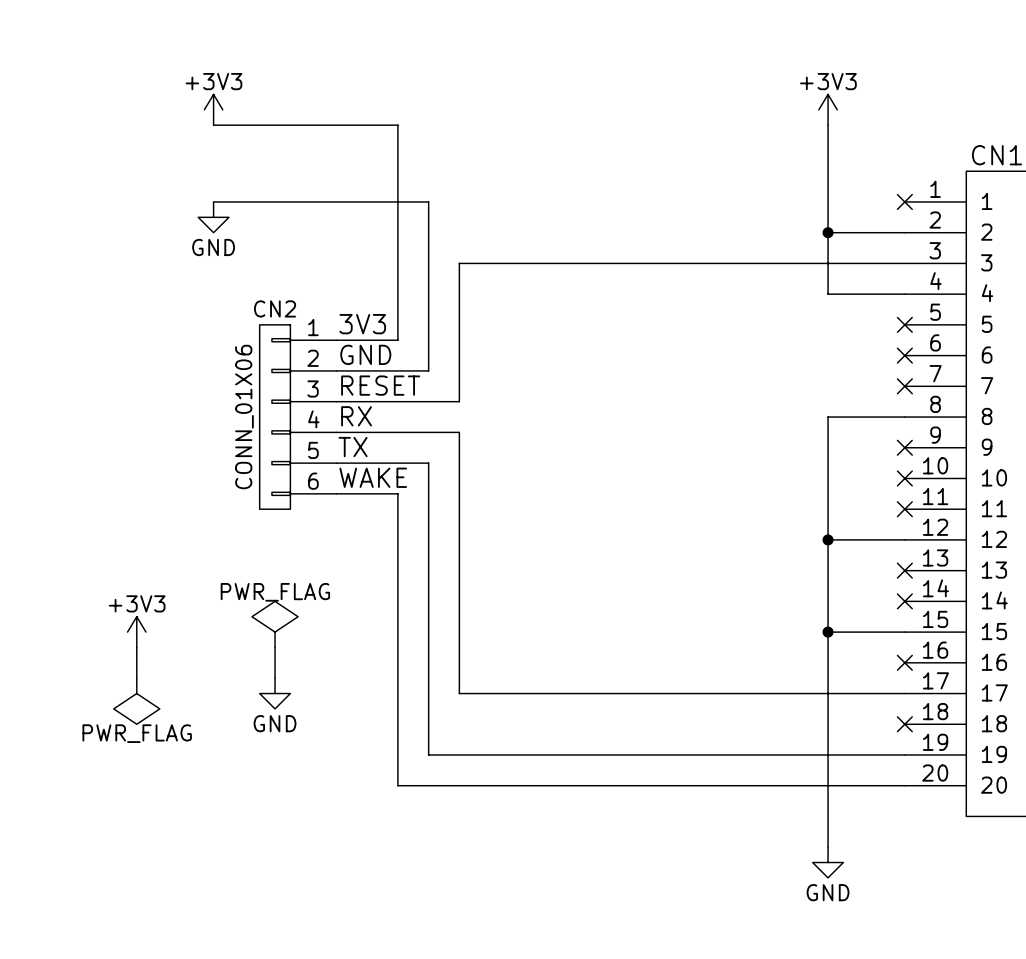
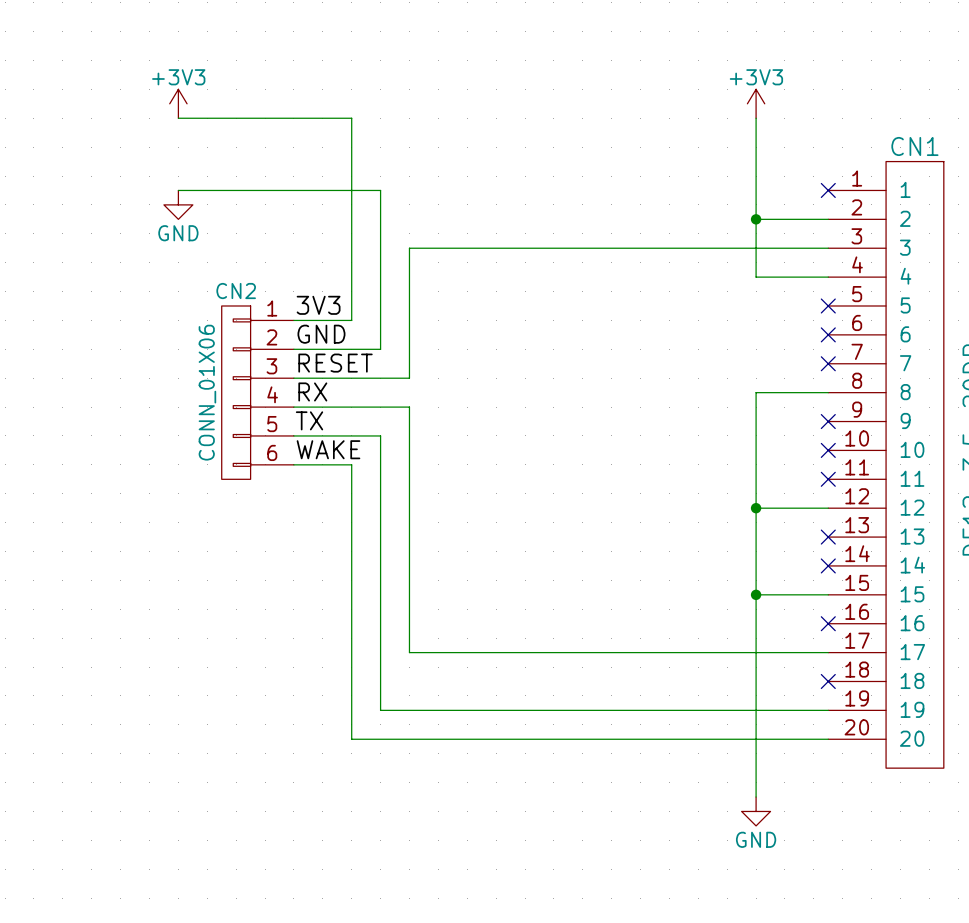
power symbol: PWR_FLAG (275, 624) -> none
power symbol: +3V3 (136, 632) -> none
wire: (136, 647) (136, 678) -> none
wire: (275, 647) (275, 678) -> none
power symbol: GND (275, 693) -> none
power symbol: PWR_FLAG (136, 701) -> none

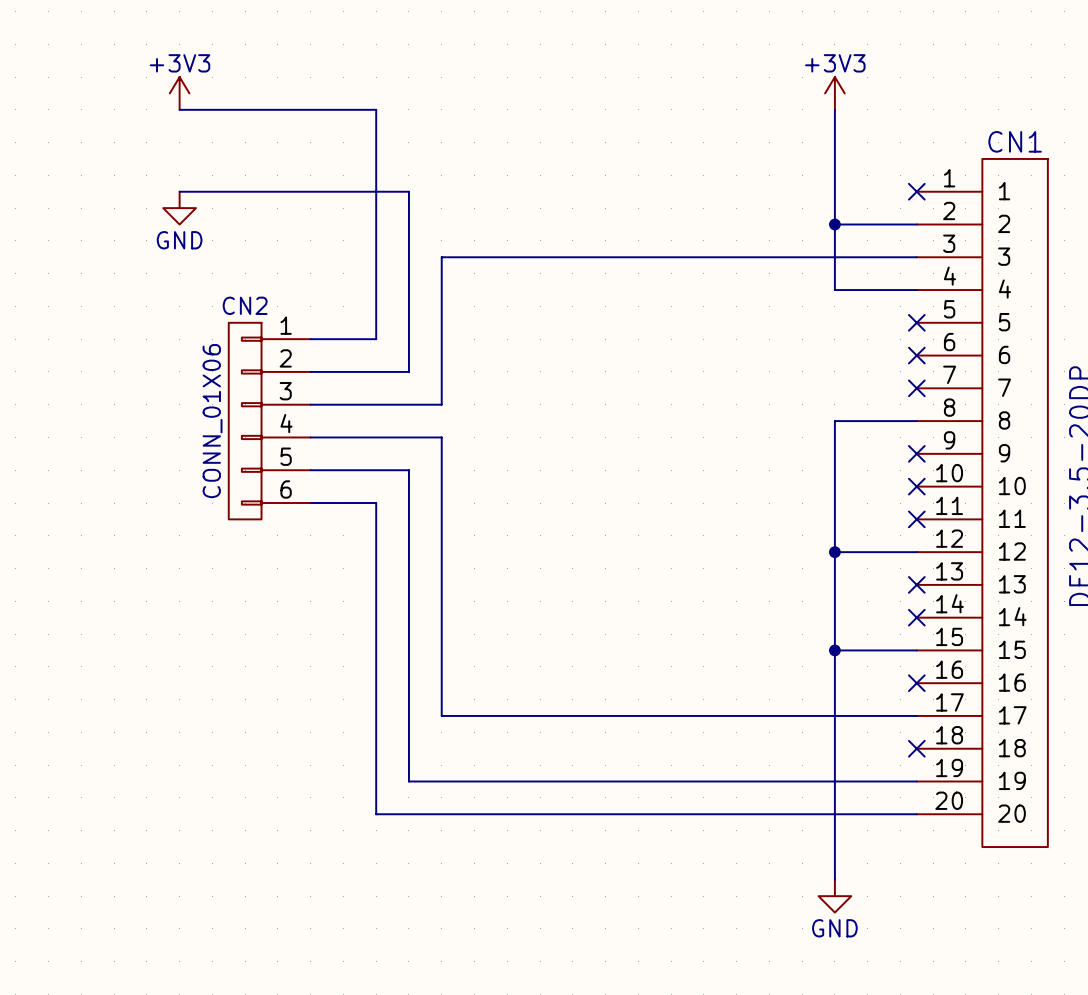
label: 3V3 (318, 305) -> none
label: GND (321, 334) -> none
label: RESET (335, 363) -> none
label: RX (312, 391) -> none
label: TX (309, 420) -> none
label: WAKE (328, 449) -> none

